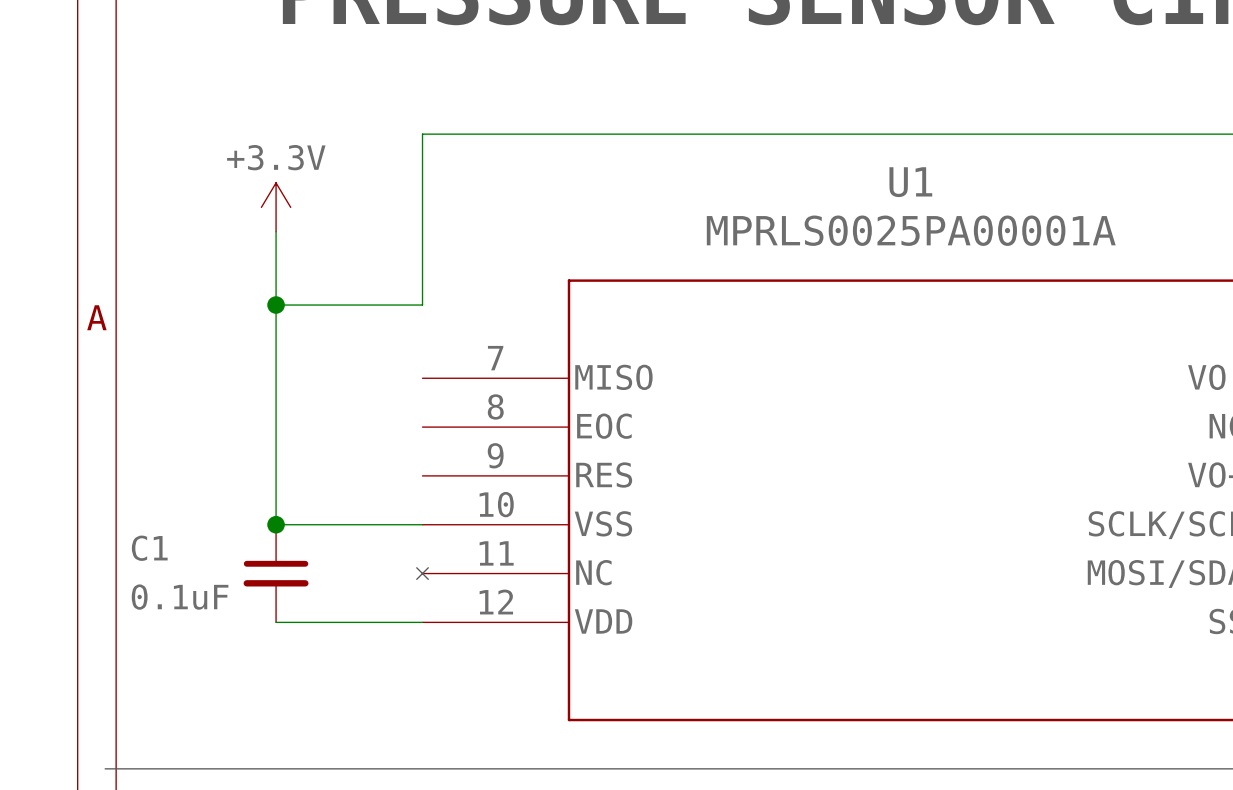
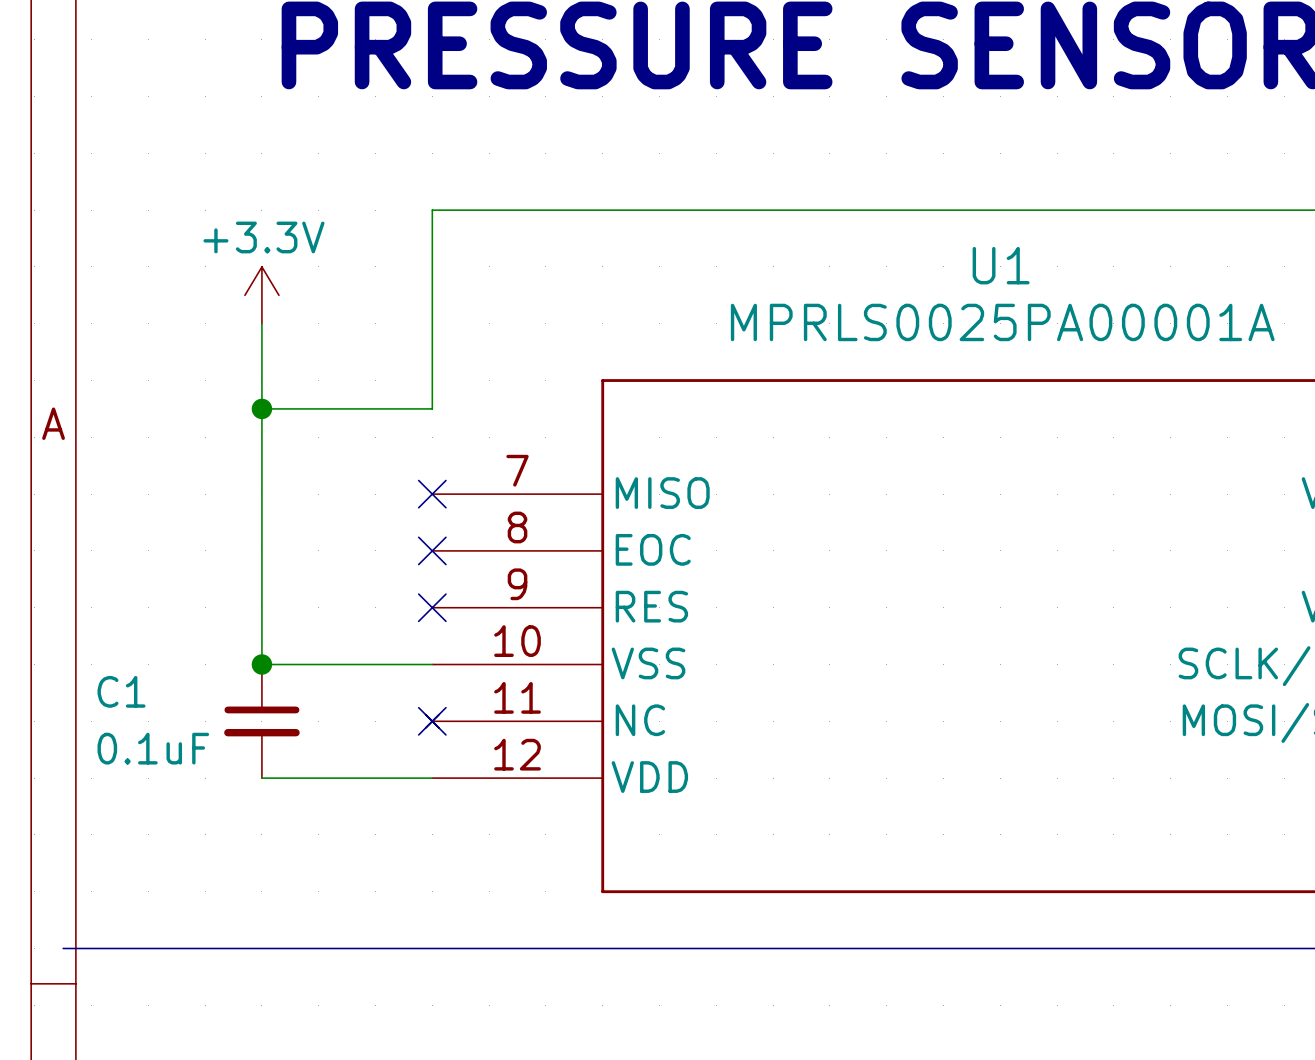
no-connect mark: none -> (432, 494)
no-connect mark: none -> (432, 550)
no-connect mark: none -> (432, 607)
no-connect mark: none -> (432, 721)

